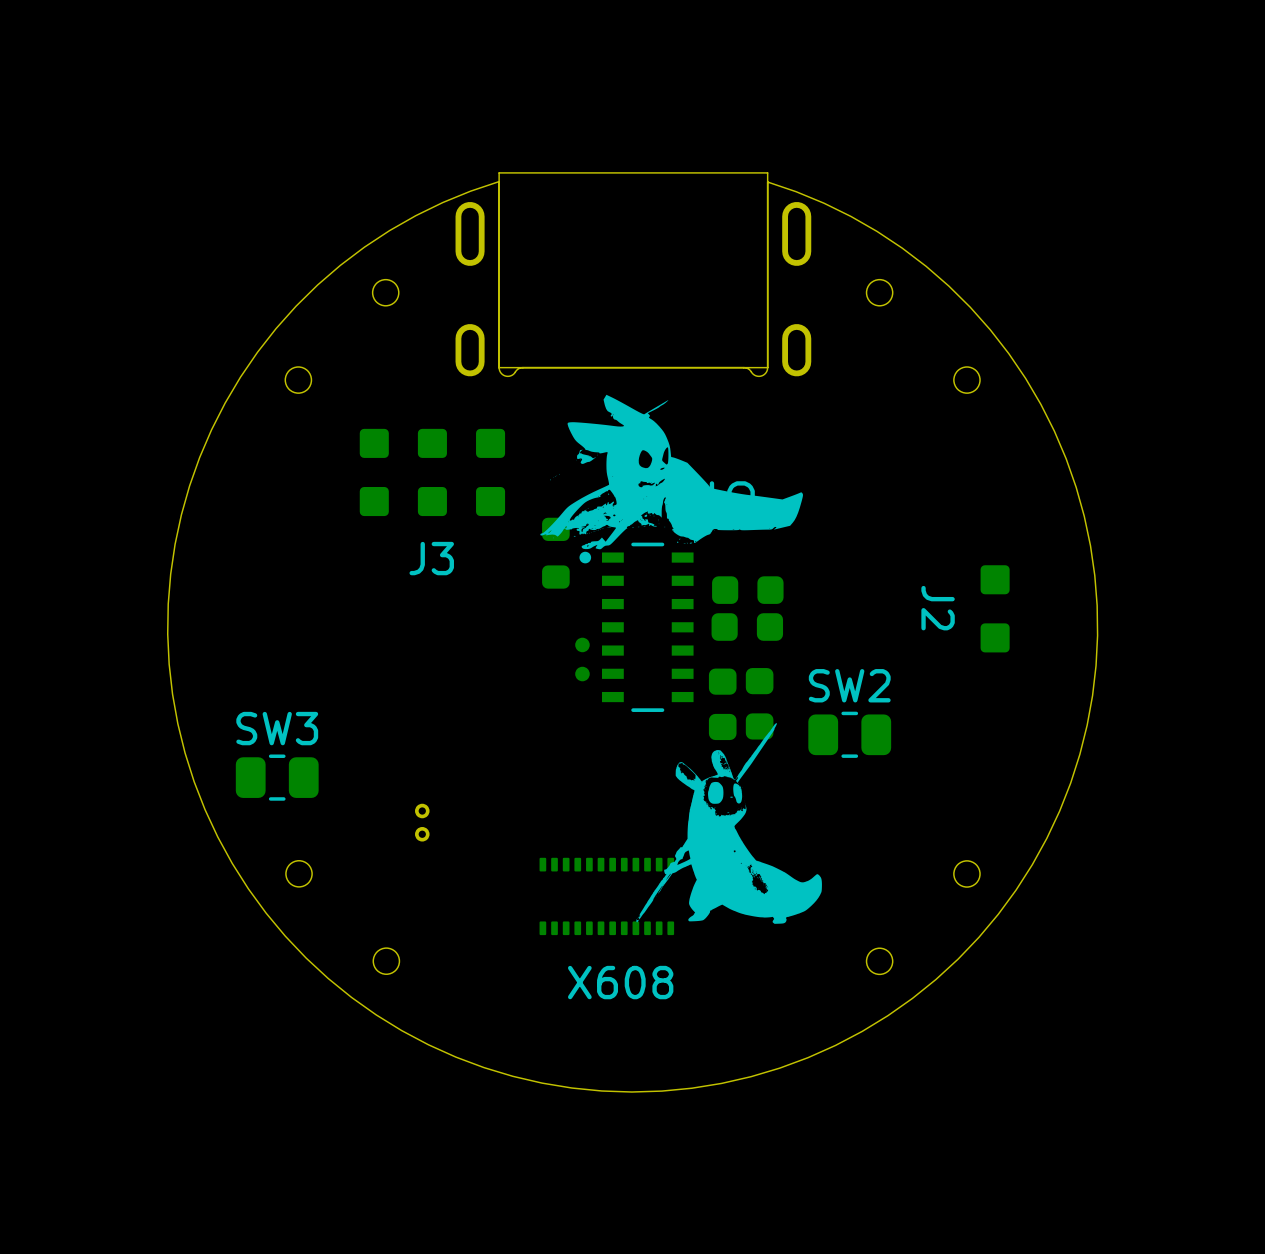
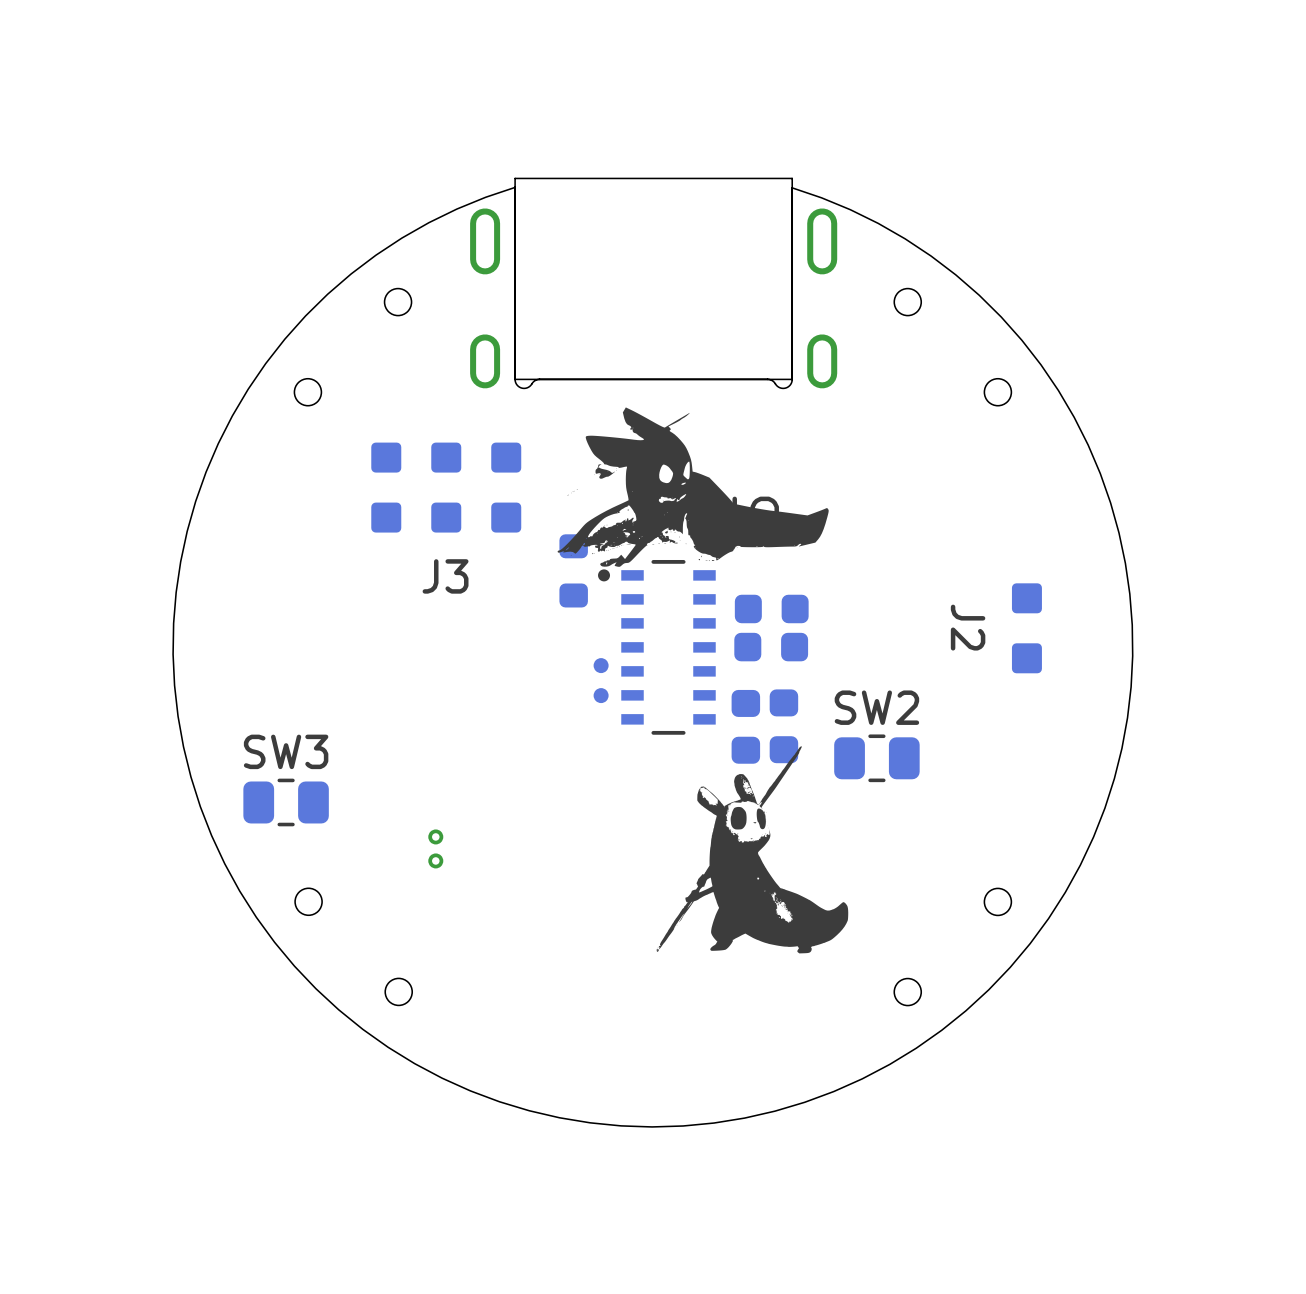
X608: (606, 896) -> none

